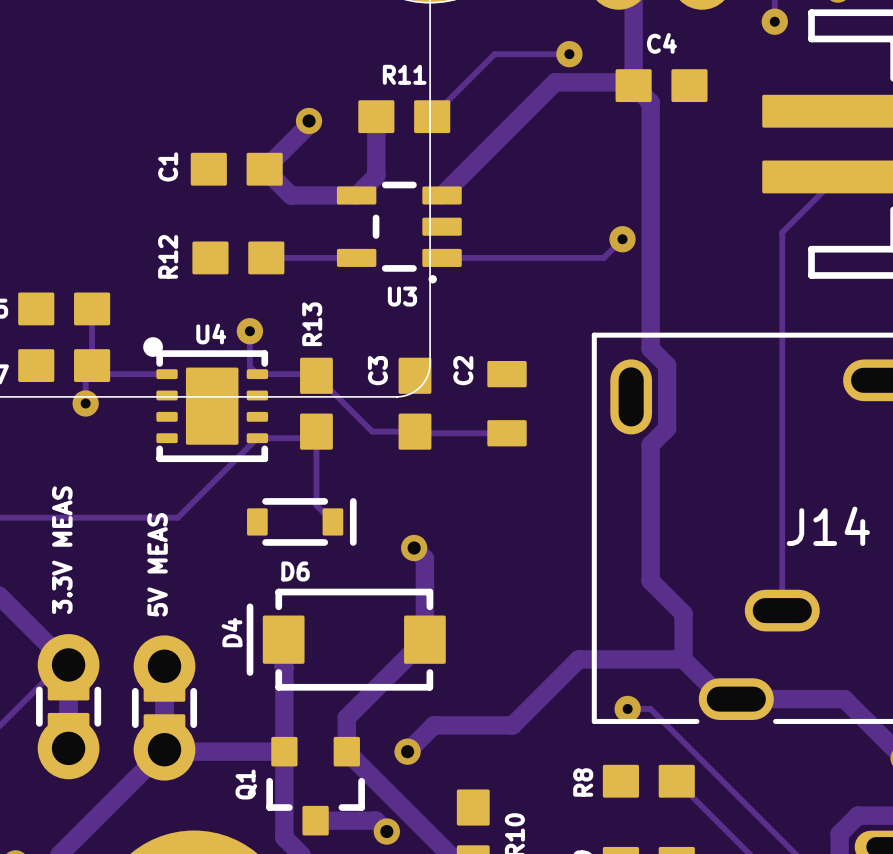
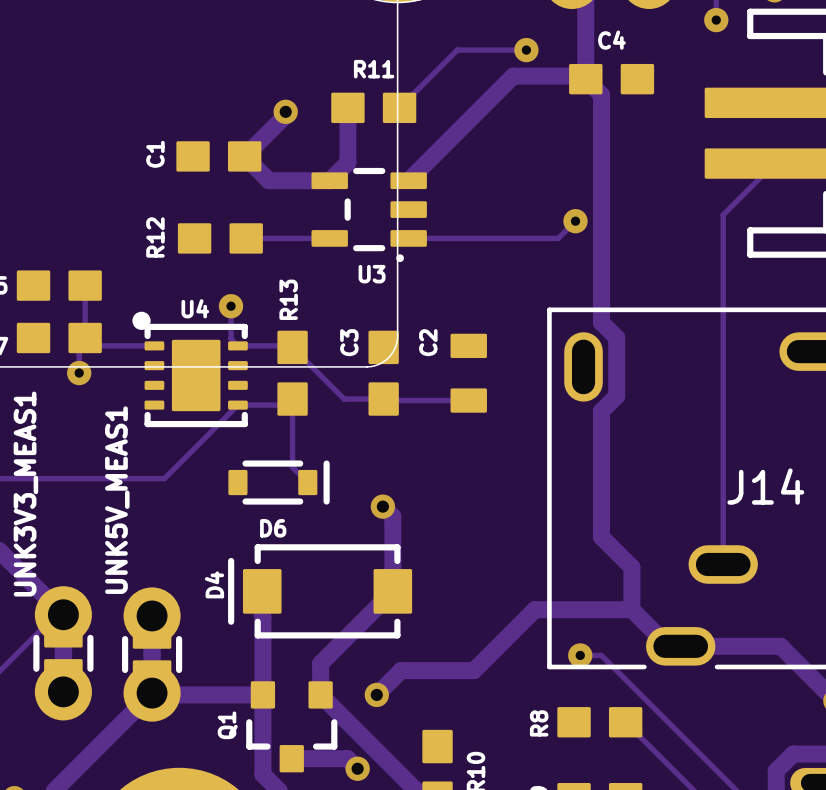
UNK3V3_MEAS1 name: none -> UNK3V3_MEAS1 (25, 494)
UNK5V_MEAS1 name: none -> UNK5V_MEAS1 (117, 500)
text: 3.3V MEAS (62, 550) -> none
text: 5V MEAS (157, 564) -> none

